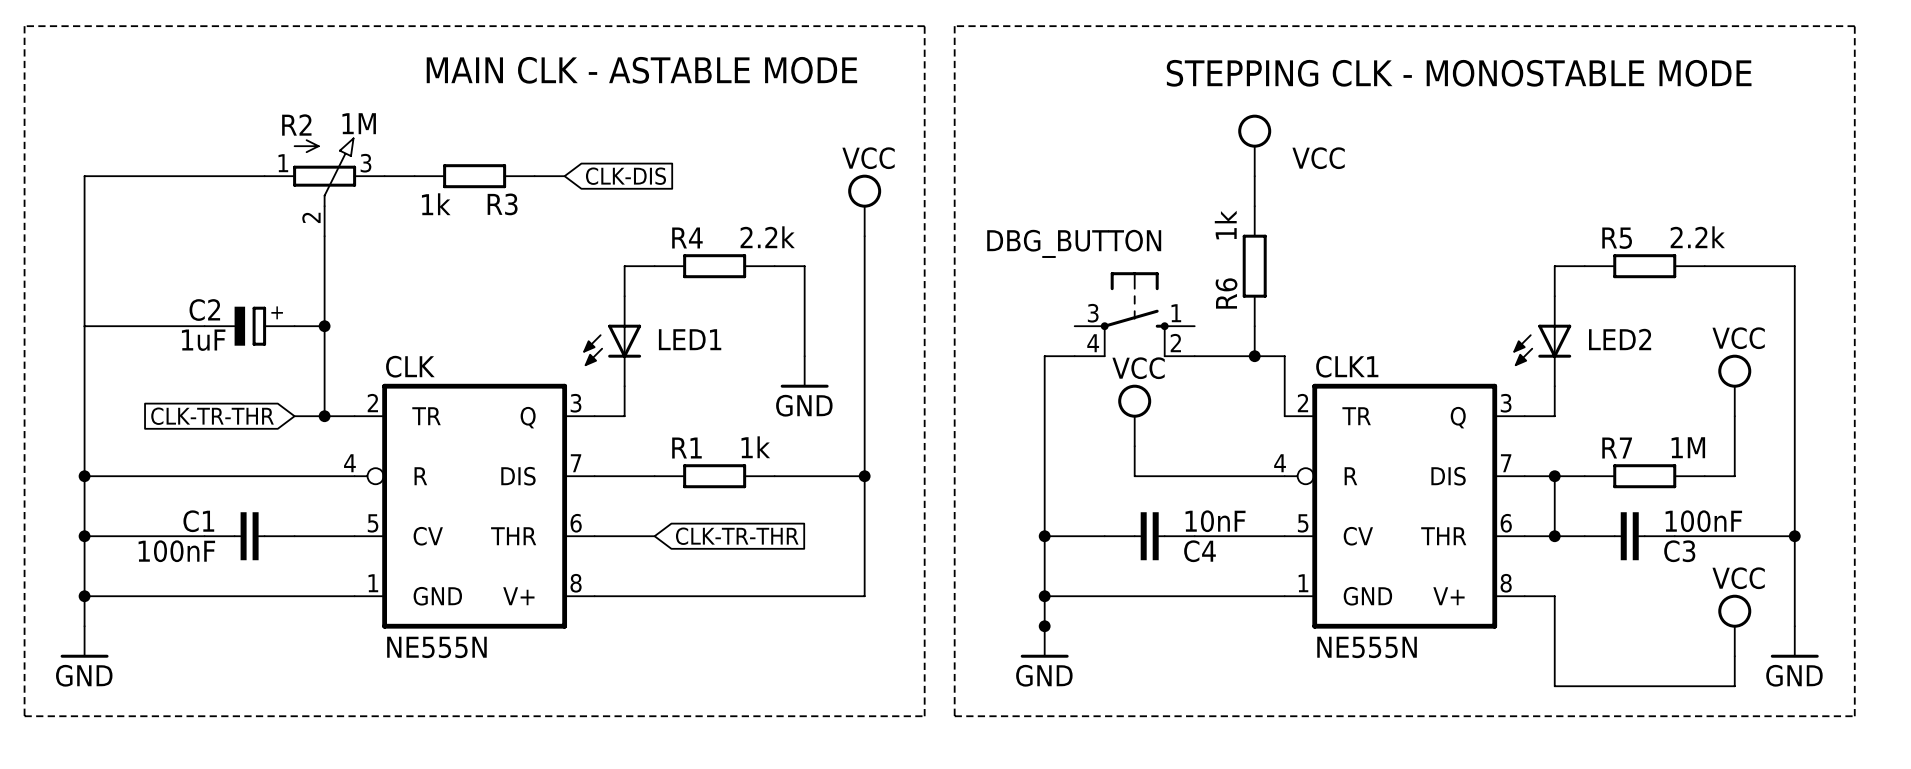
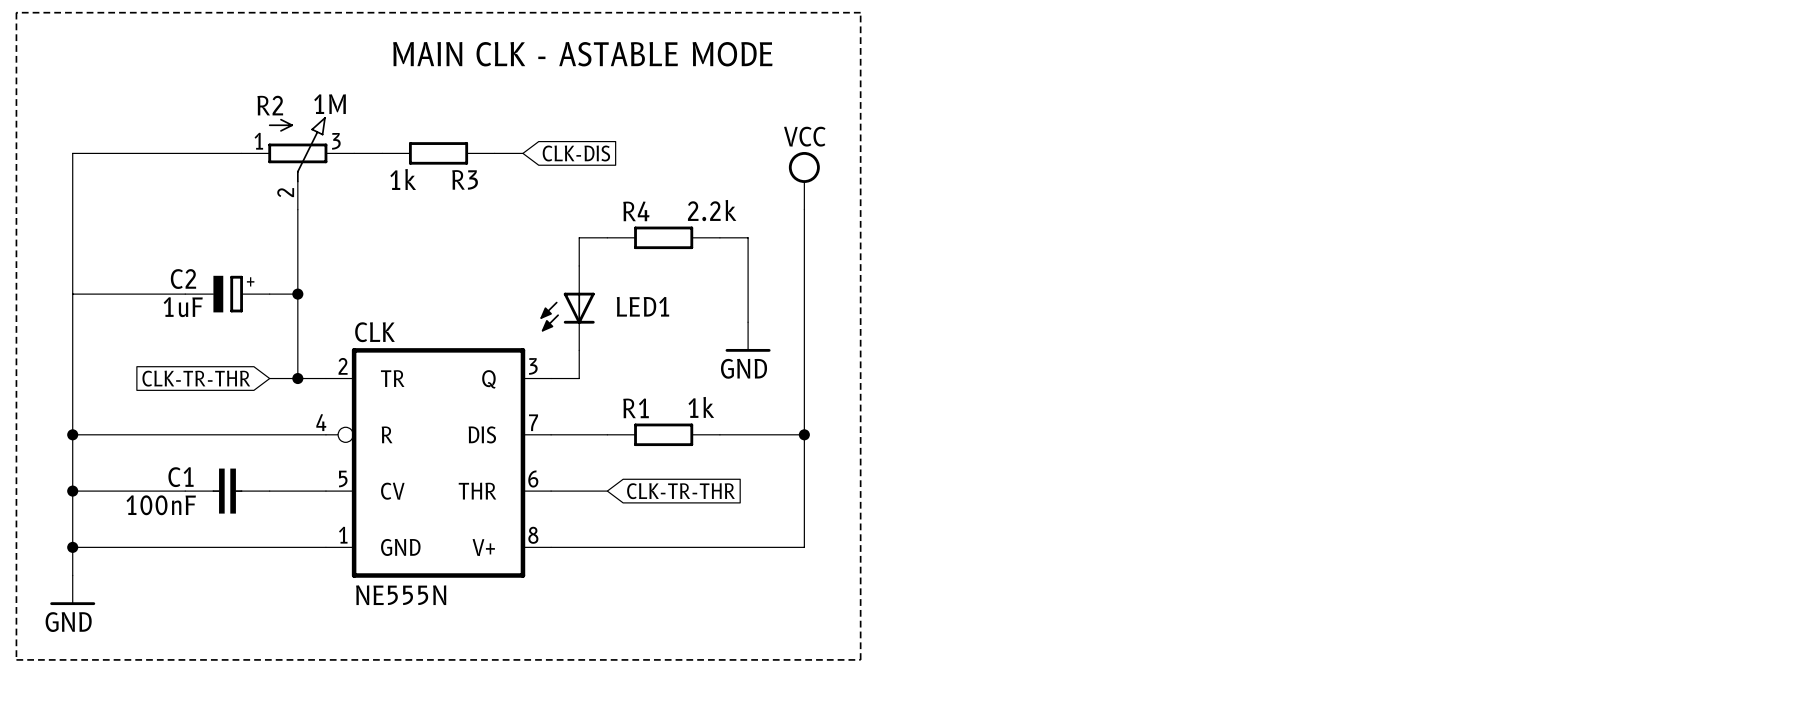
line: (954, 26) (954, 716) (1854, 716) (1854, 26) (954, 26) -> none
text: STEPPING CLK - MONOSTABLE MODE (1459, 73) -> none
power symbol: VCC (1254, 145) -> none
wire: (1254, 176) (1254, 206) -> none
R6: 1k (1254, 266) -> none
wire: (1584, 266) (1554, 266) (1554, 296) -> none
R5: 2.2k (1644, 266) -> none
wire: (1704, 266) (1794, 266) (1794, 626) -> none
DBG_BUTTON: (1134, 314) -> none
wire: (1254, 326) (1254, 356) -> none
LED2: (1542, 341) -> none
wire: (1074, 356) (1044, 356) (1044, 626) -> none
wire: (1194, 356) (1284, 356) (1284, 416) -> none
junction: (1254, 356) -> none
power symbol: VCC (1734, 385) -> none
wire: (1554, 386) (1554, 416) (1524, 416) -> none
power symbol: VCC (1134, 415) -> none
wire: (1734, 416) (1734, 476) (1704, 476) -> none
wire: (1134, 446) (1134, 476) (1284, 476) -> none
wire: (1524, 476) (1584, 476) -> none
wire: (1554, 476) (1554, 536) -> none
junction: (1554, 476) -> none
R7: 1M (1644, 476) -> none
CLK1: NE555N (1404, 506) -> none
wire: (1044, 536) (1104, 536) -> none
junction: (1044, 536) -> none
C4: 10nF (1149, 536) -> none
wire: (1194, 536) (1284, 536) -> none
wire: (1524, 536) (1584, 536) -> none
junction: (1554, 536) -> none
C3: 100nF (1629, 536) -> none
wire: (1674, 536) (1794, 536) -> none
junction: (1794, 536) -> none
wire: (1044, 596) (1284, 596) -> none
junction: (1044, 596) -> none
wire: (1524, 596) (1554, 596) (1554, 686) (1734, 686) (1734, 656) -> none
power symbol: VCC (1734, 625) -> none
junction: (1044, 626) -> none
power symbol: GND (1044, 641) -> none
power symbol: GND (1794, 641) -> none

